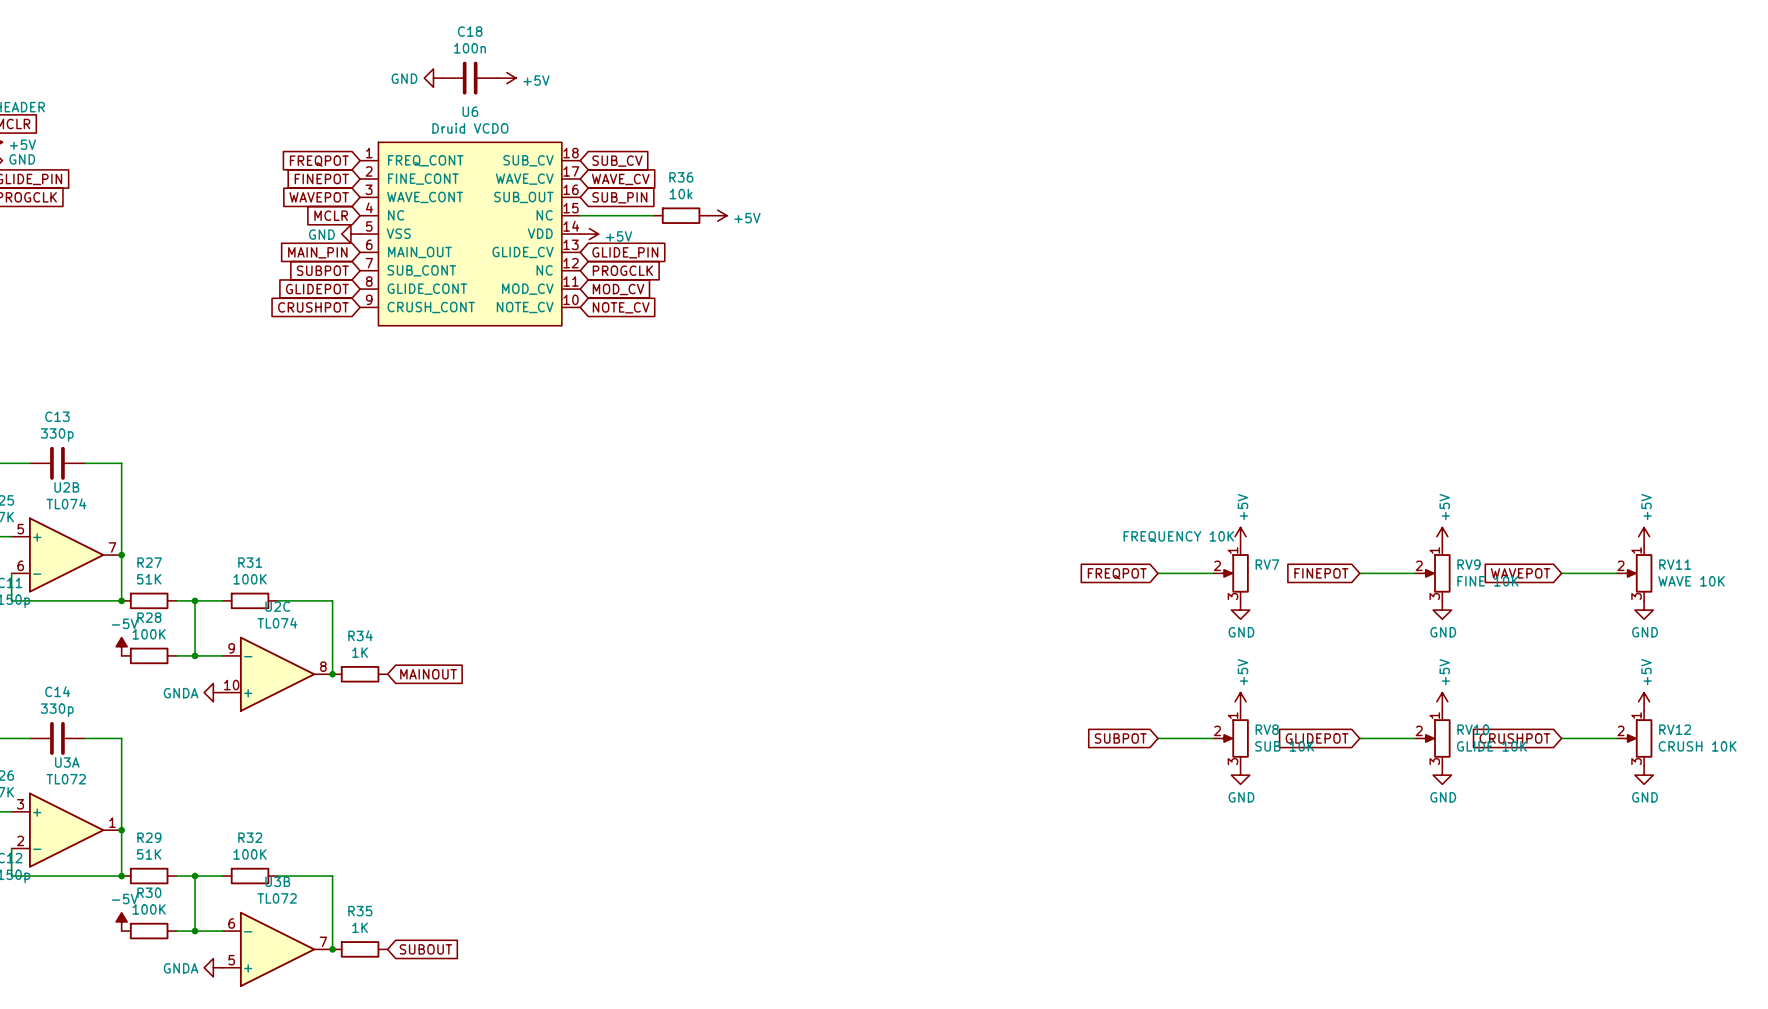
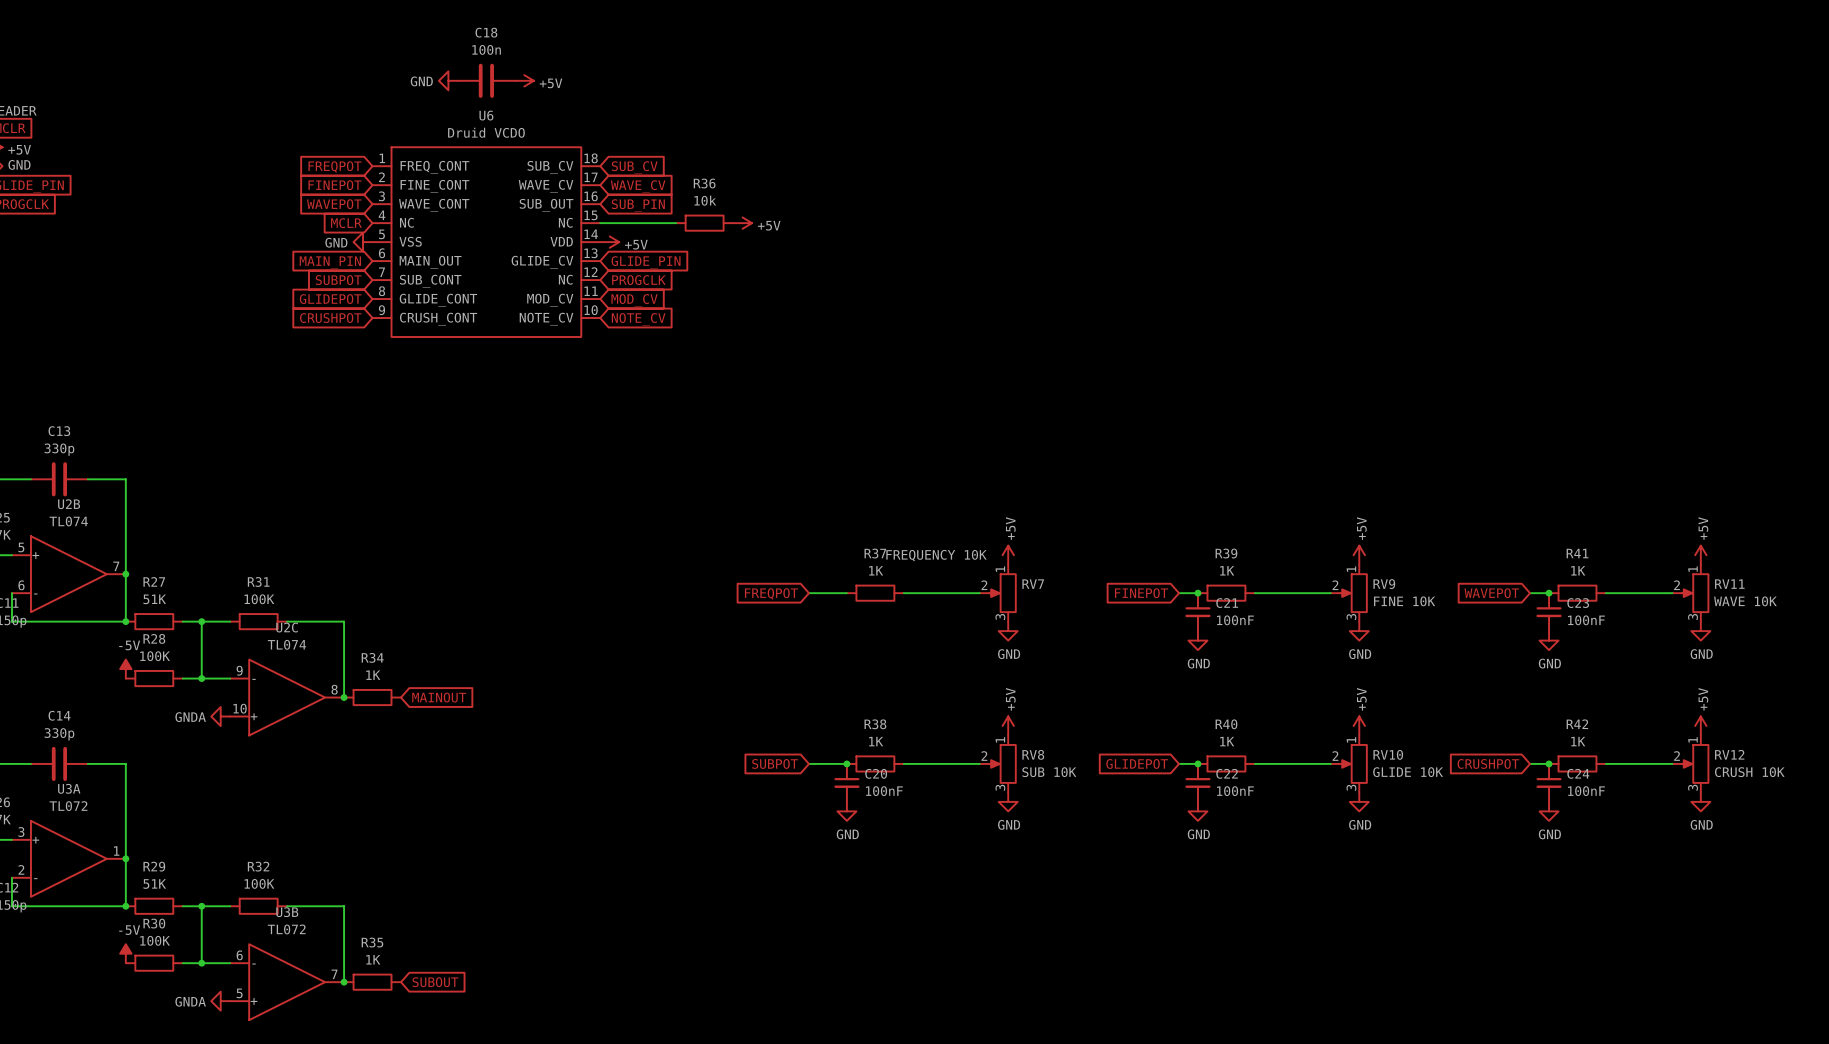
power symbol: none -> +5V (1008, 555)
power symbol: +5V (1240, 536) -> none
power symbol: none -> +5V (1359, 555)
power symbol: +5V (1442, 536) -> none
global label: none -> FREQPOT (771, 593)
wire: none -> (808, 593) (846, 593)
R37: none -> 1K (875, 593)
wire: none -> (903, 593) (979, 593)
global label: FREQPOT (1117, 573) -> FINEPOT (1141, 593)
wire: (1158, 573) (1213, 573) -> (1197, 593) (1179, 593)
junction: none -> (1197, 593)
R39: none -> 1K (1226, 593)
wire: none -> (1254, 593) (1330, 593)
RV7 position: (1230, 573) -> (998, 593)
global label: FINEPOT (1321, 573) -> none
wire: (1359, 573) (1414, 573) -> none
RV9 position: (1432, 573) -> (1349, 593)
wire: none -> (1530, 593) (1549, 593)
junction: none -> (1549, 593)
global label position: WAVEPOT (1520, 573) -> WAVEPOT (1491, 593)
R41: none -> 1K (1577, 593)
wire: none -> (1605, 593) (1615, 593)
C21: none -> 100nF (1197, 612)
C23: none -> 100nF (1549, 612)
power symbol: none -> GND (1008, 631)
power symbol: GND (1240, 610) -> none
power symbol: none -> GND (1359, 631)
power symbol position: GND (1442, 610) -> GND (1549, 640)
power symbol: none -> GND (1197, 640)
power symbol: none -> +5V (1008, 725)
power symbol: +5V (1240, 701) -> none
power symbol: none -> +5V (1359, 725)
power symbol: +5V (1442, 701) -> none
global label: none -> SUBPOT (775, 763)
wire: none -> (808, 763) (846, 763)
junction: none -> (846, 763)
R38: none -> 1K (875, 763)
wire: none -> (903, 763) (979, 763)
global label: none -> GLIDEPOT (1137, 763)
global label: SUBPOT (1120, 738) -> none
wire: (1158, 738) (1213, 738) -> (1197, 763) (1179, 763)
junction: none -> (1197, 763)
R40: none -> 1K (1226, 763)
wire: none -> (1254, 763) (1330, 763)
RV8 position: (1230, 738) -> (998, 763)
global label: GLIDEPOT (1317, 738) -> none
wire: (1359, 738) (1414, 738) -> none
RV10 position: (1432, 738) -> (1349, 763)
wire: none -> (1530, 763) (1549, 763)
junction: none -> (1549, 763)
global label position: CRUSHPOT (1514, 738) -> CRUSHPOT (1488, 763)
R42: none -> 1K (1577, 763)
wire: none -> (1605, 763) (1615, 763)
C20: none -> 100nF (846, 782)
C22: none -> 100nF (1197, 782)
C24: none -> 100nF (1549, 782)
power symbol: none -> GND (1008, 801)
power symbol: GND (1240, 775) -> none
power symbol: none -> GND (1359, 801)
power symbol position: GND (1442, 775) -> GND (1549, 811)
power symbol: none -> GND (846, 811)
power symbol: none -> GND (1197, 811)

